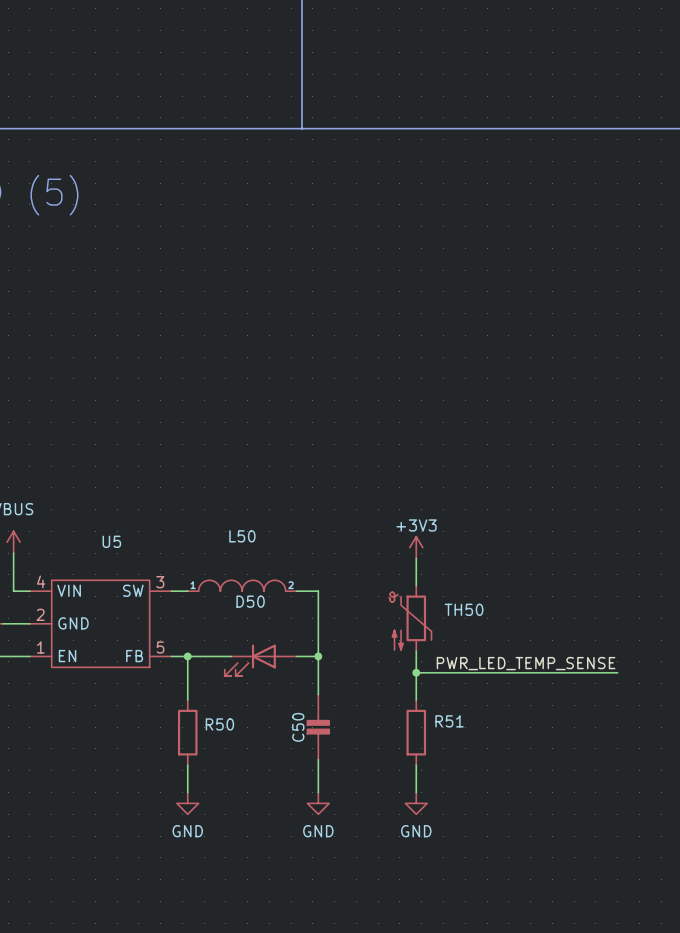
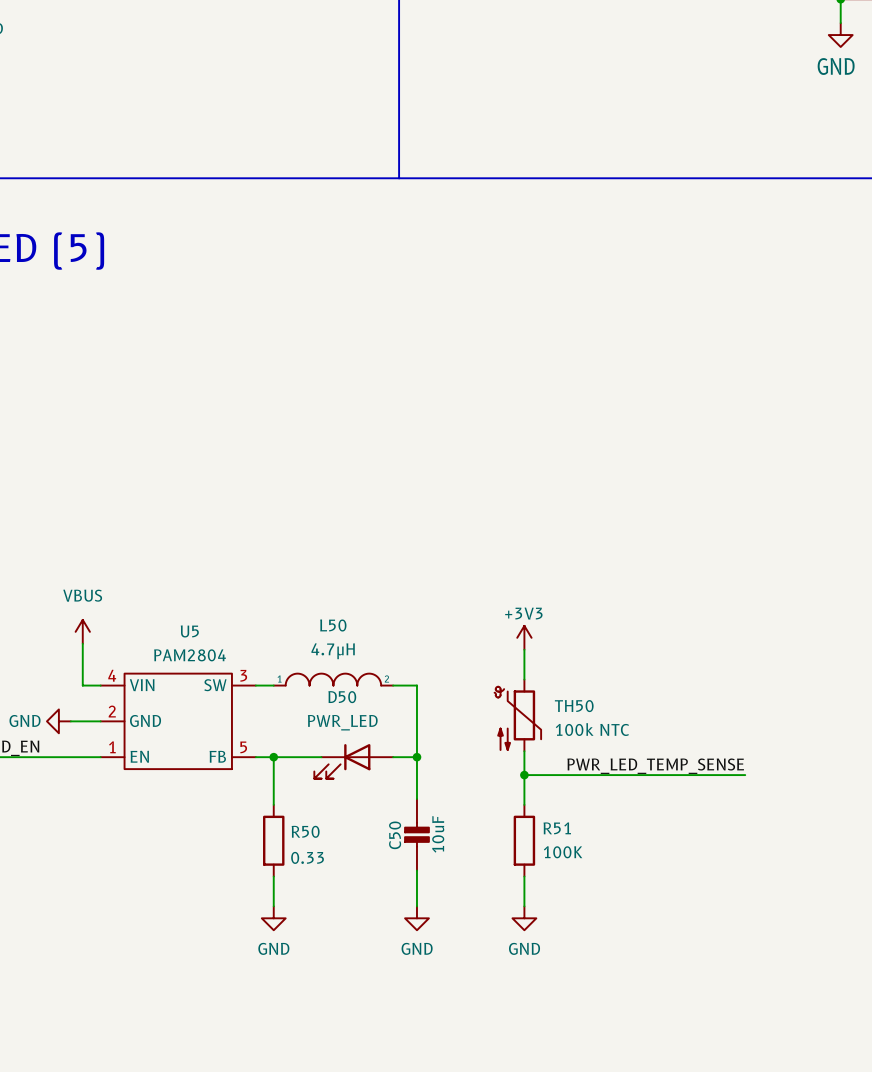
L50 value: none -> 4.7μH (333, 651)
U5 value: none -> PAM2804 (190, 655)
D50 value: none -> PWR_LED (342, 722)
TH50 value: none -> 100k NTC (592, 729)
C50 value: none -> 10uF (438, 834)
R51 value: none -> 100K (563, 852)
R50 value: none -> 0.33 (307, 857)

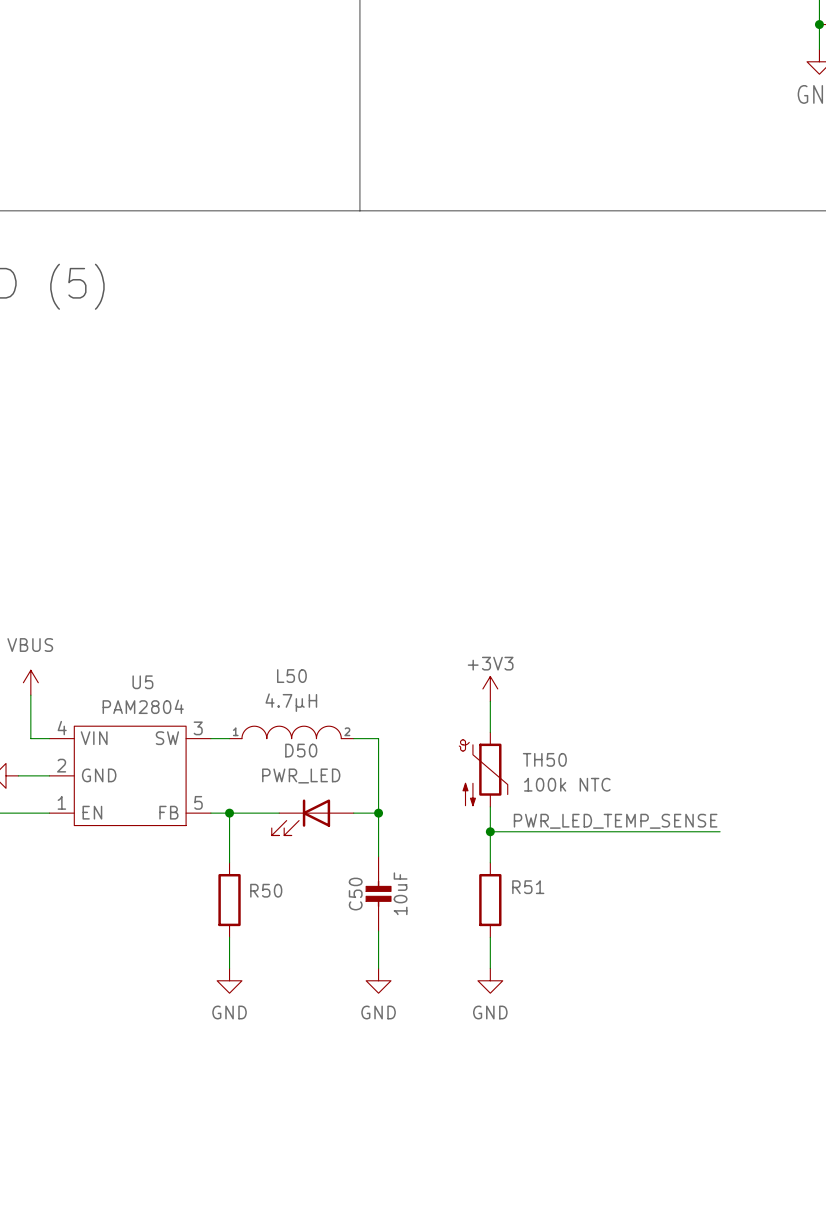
R51 value: 100K (563, 852) -> none
R50 value: 0.33 (307, 857) -> none

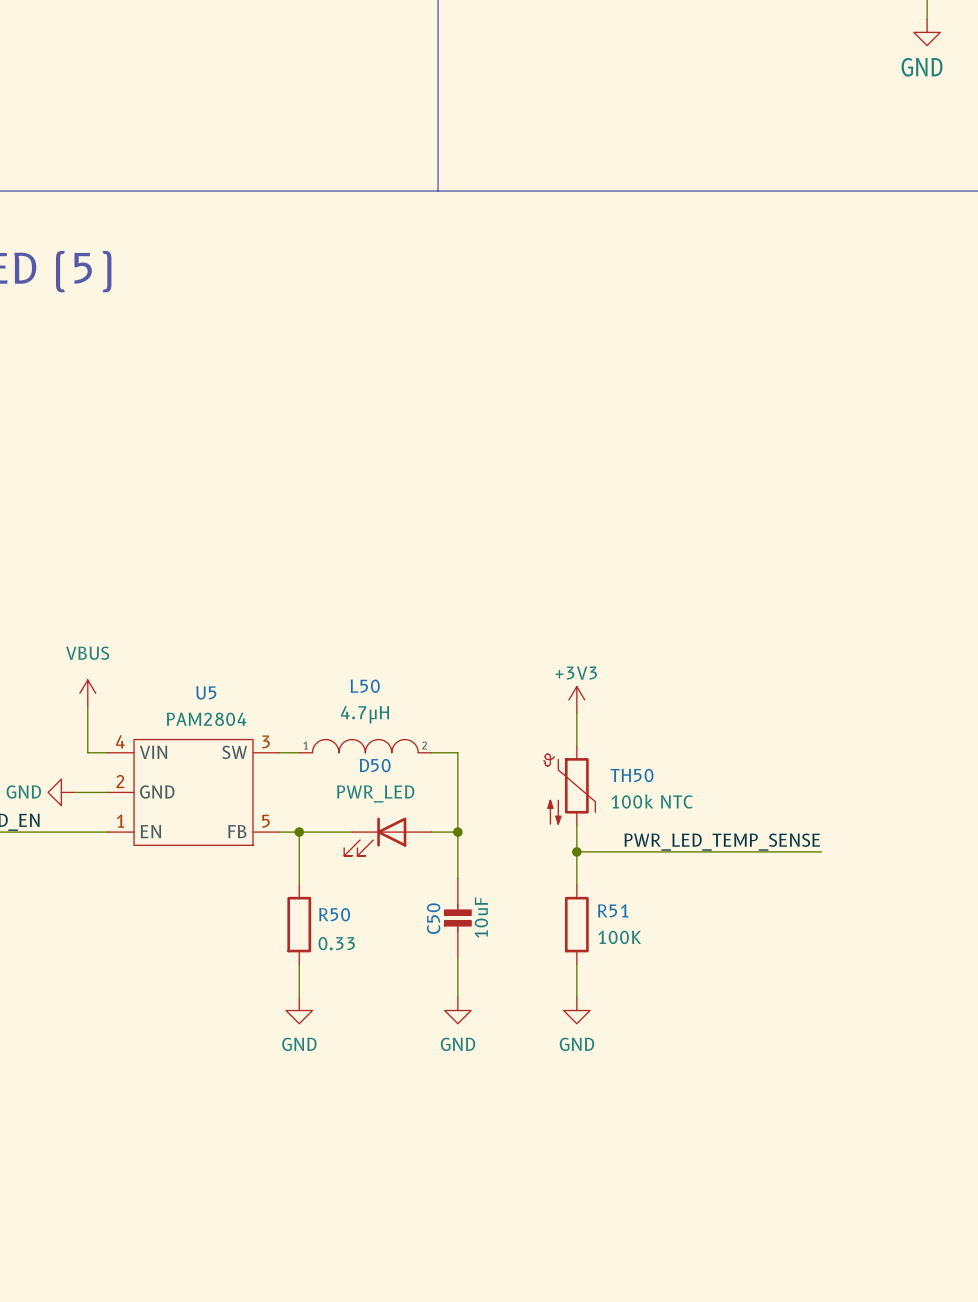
R51 value: none -> 100K (619, 937)
R50 value: none -> 0.33 (336, 943)

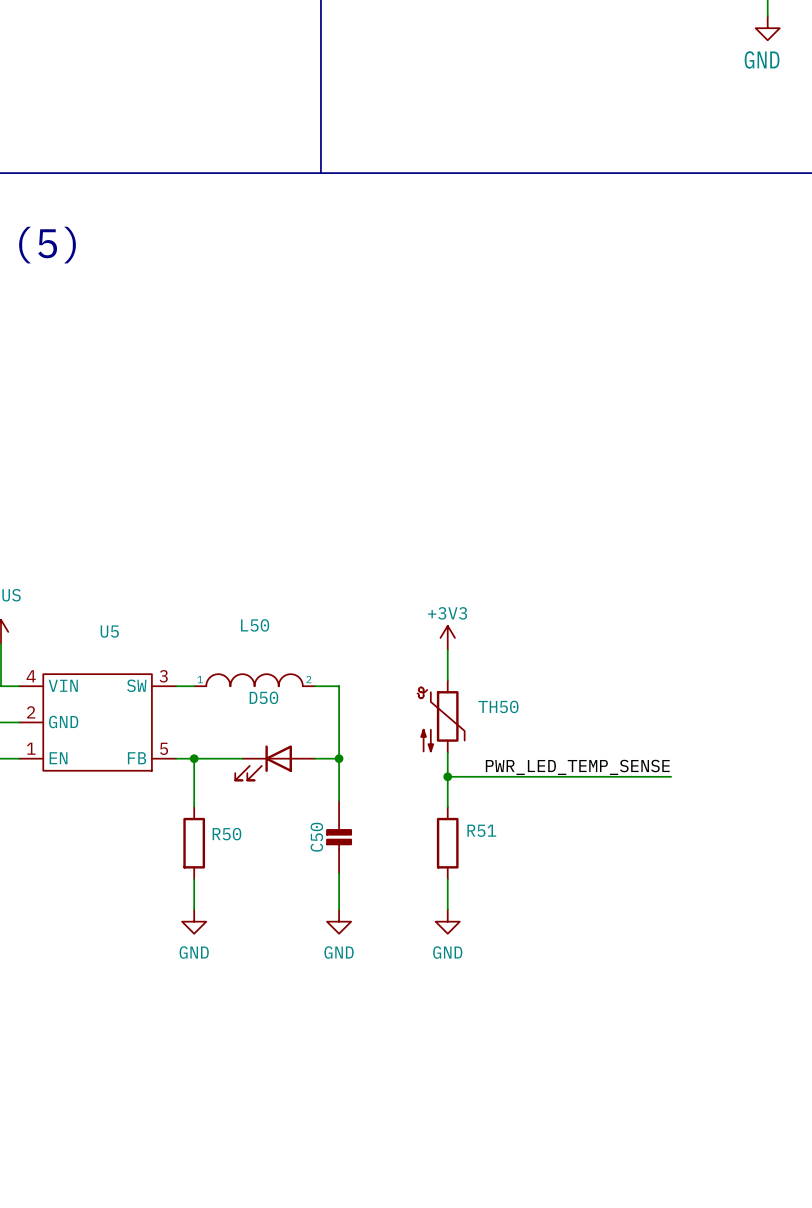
L50 value: 4.7μH (365, 714) -> none
U5 value: PAM2804 (206, 719) -> none
D50 value: PWR_LED (375, 793) -> none
TH50 value: 100k NTC (652, 801) -> none
C50 value: 10uF (481, 917) -> none
R51 value: 100K (619, 937) -> none
R50 value: 0.33 (336, 943) -> none

